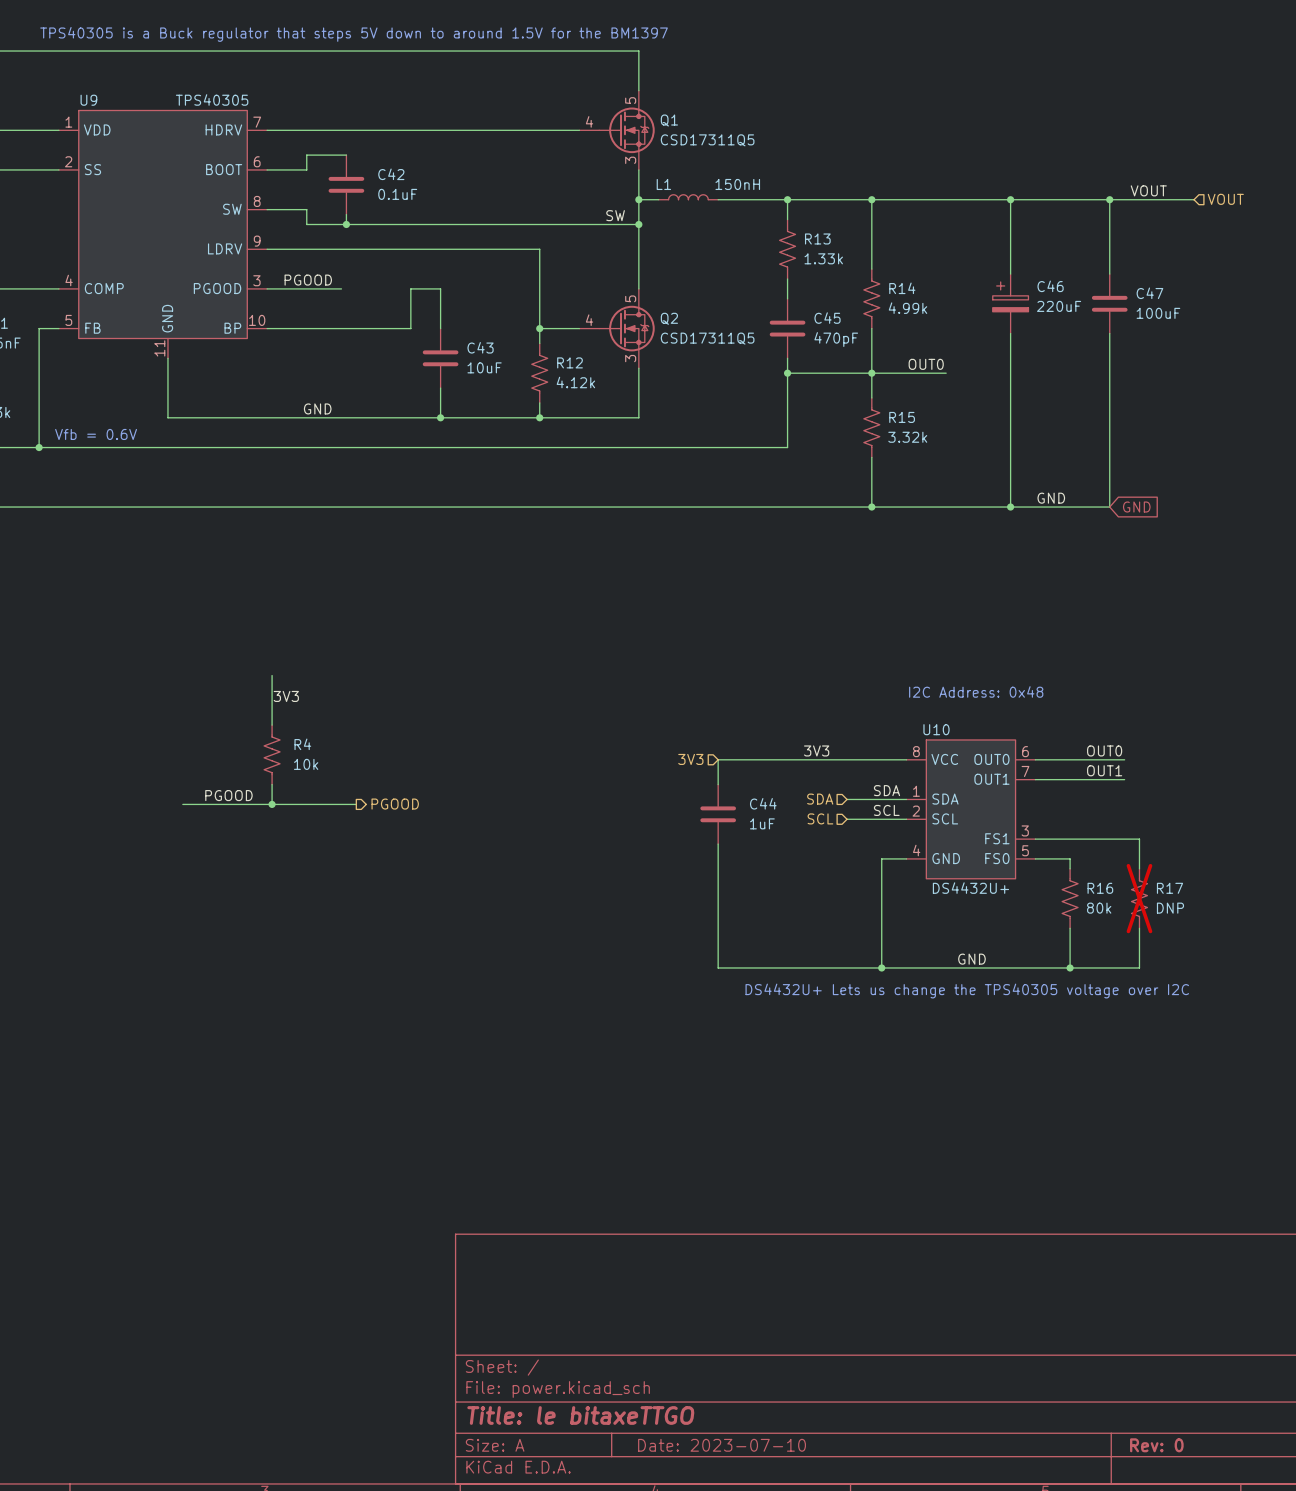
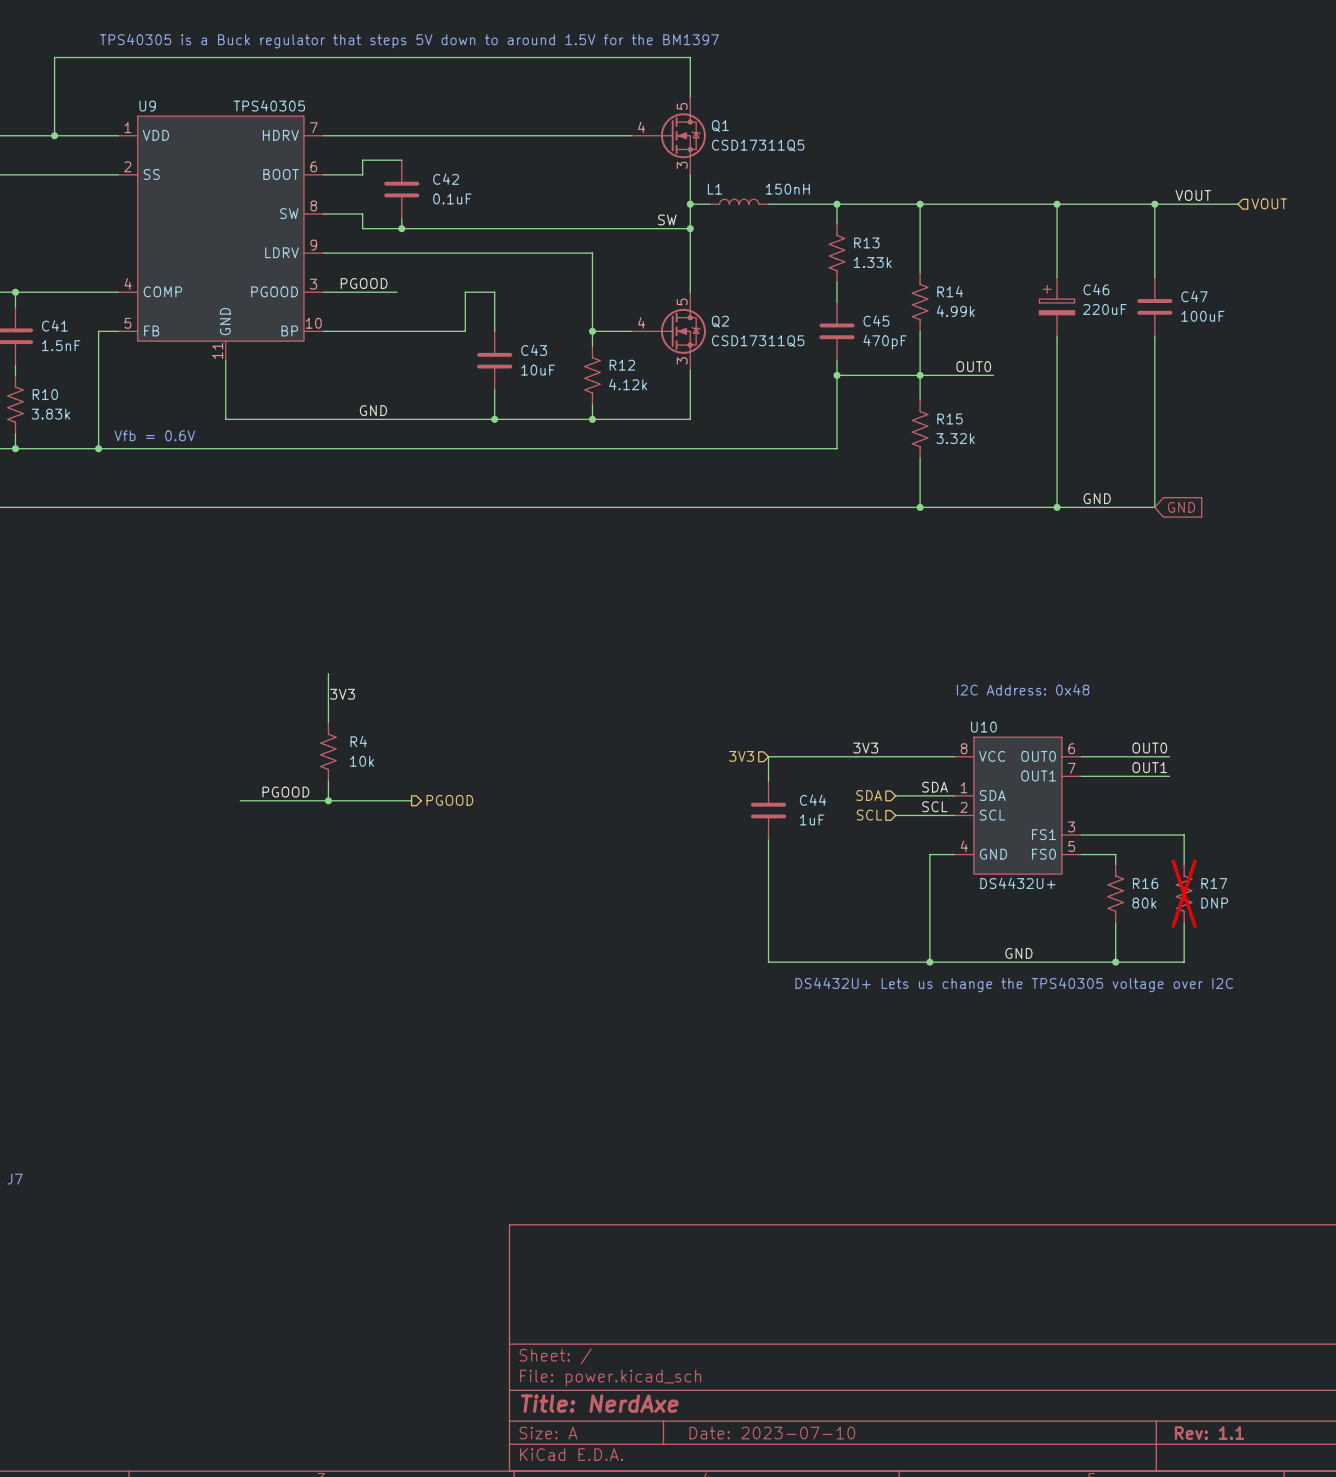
title block: Title: le bitaxeTTGO (580, 1415) -> Title: NerdAxe (599, 1403)
title block: Rev: 0 (1156, 1445) -> Rev: 1.1 (1209, 1433)

